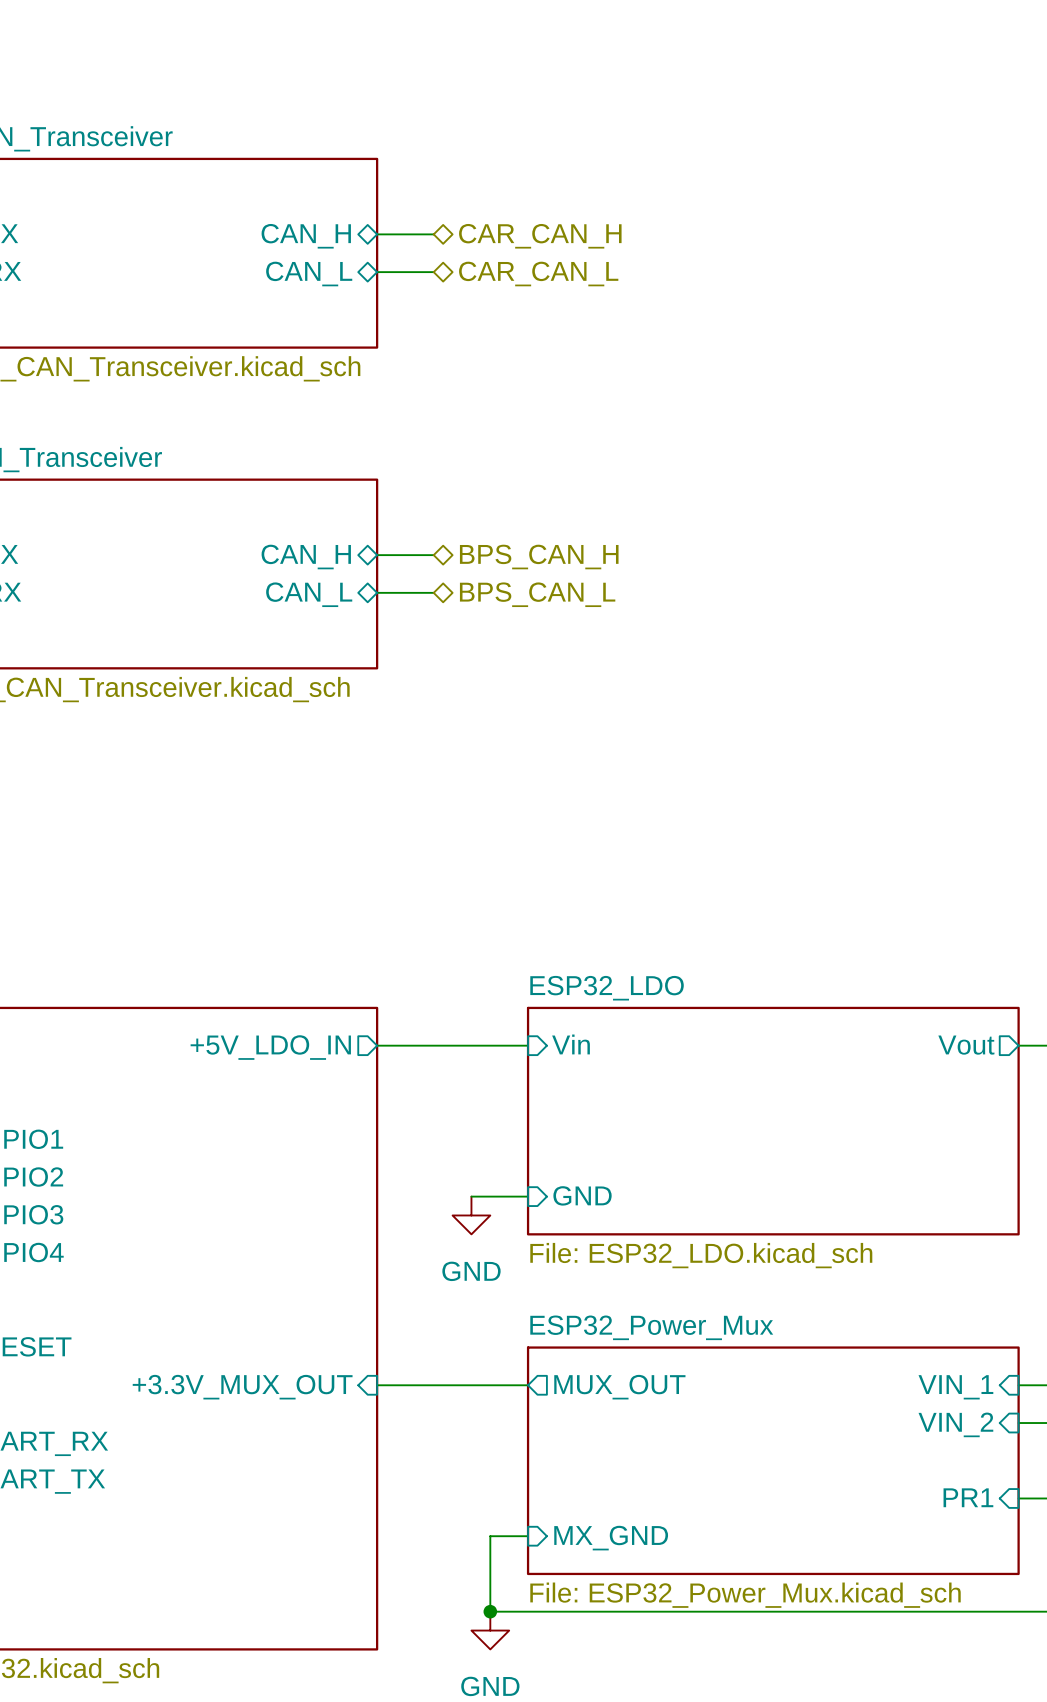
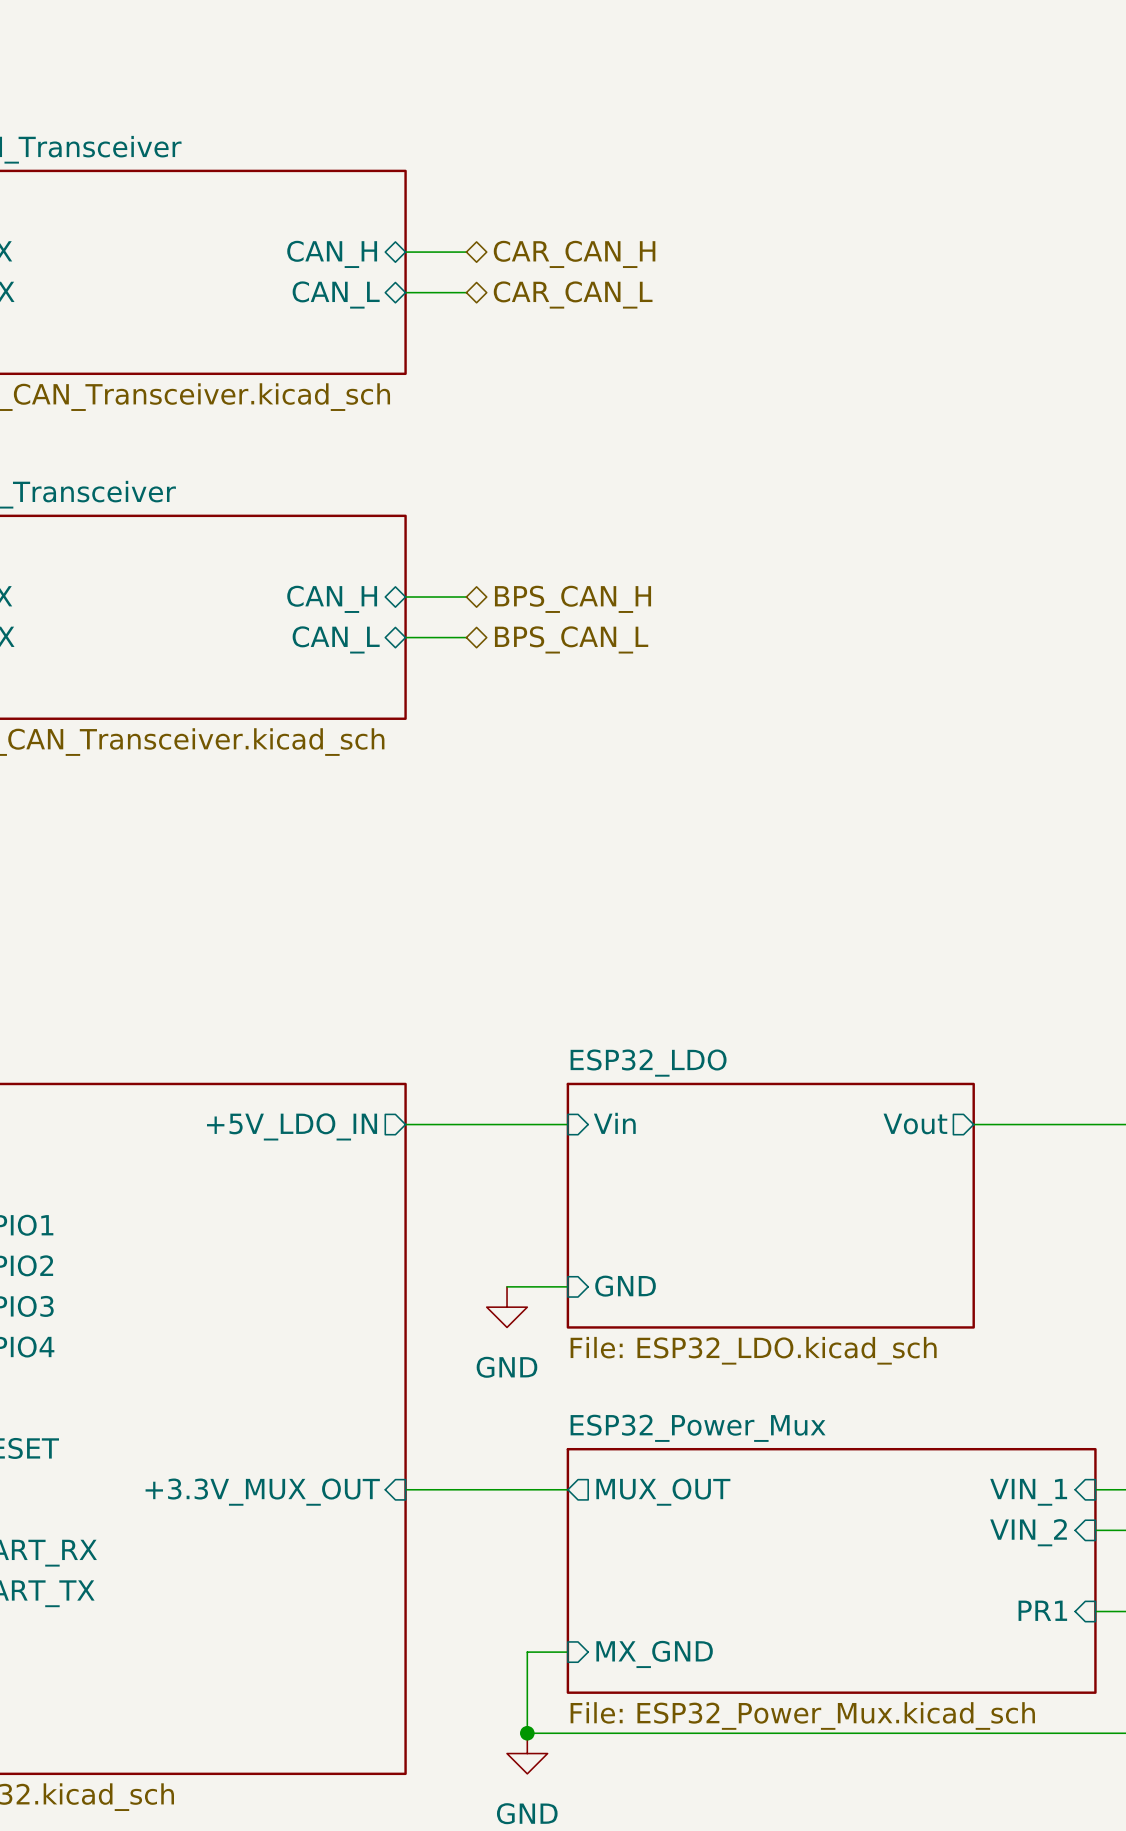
sheet ESP32_LDO shape: [526, 1006, 1020, 1236] -> [566, 1082, 975, 1329]
wire: none -> (973, 1124) (1095, 1124)
sheet pin position: Vout (966, 1045) -> Vout (915, 1123)

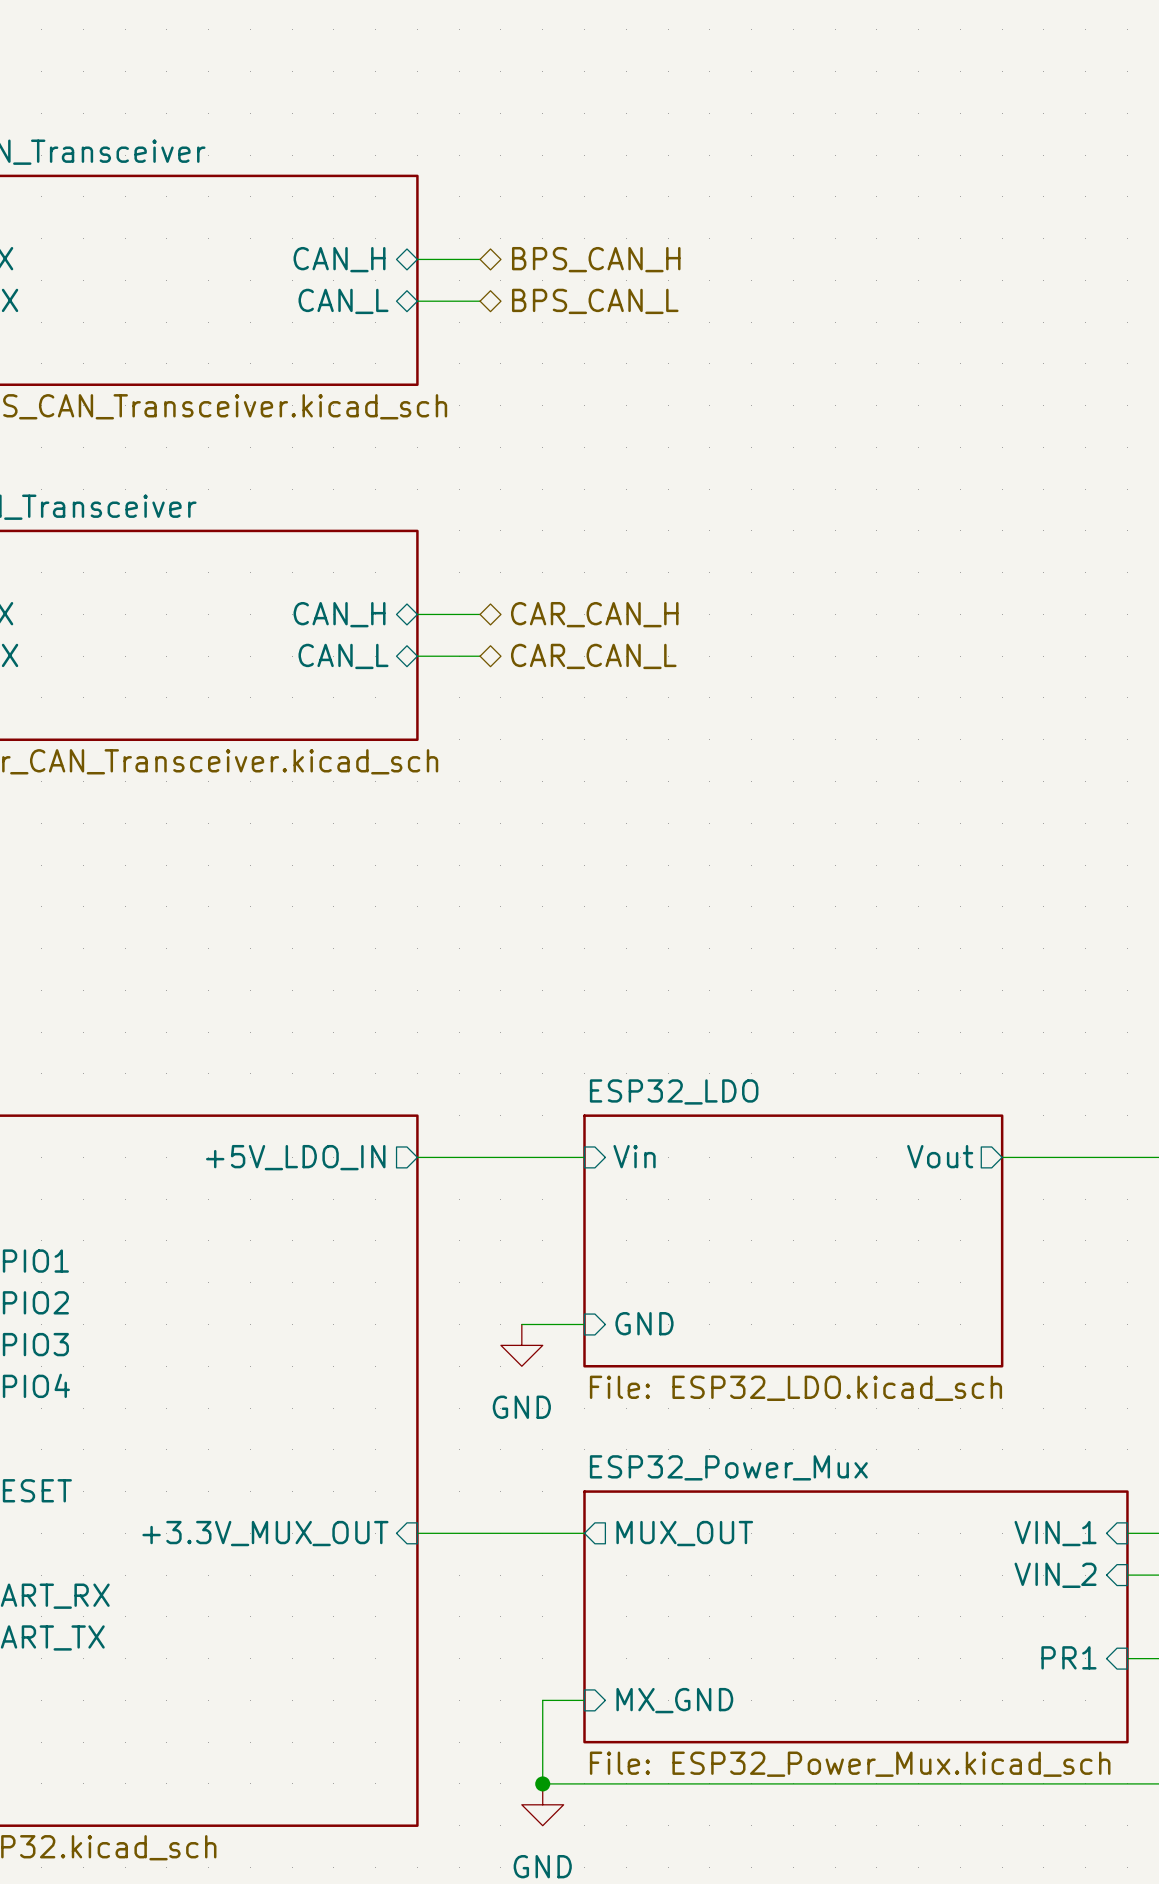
hierarchical label: CAR_CAN_H (574, 254) -> BPS_CAN_H (596, 259)
hierarchical label: CAR_CAN_L (573, 294) -> BPS_CAN_L (595, 301)
hierarchical label: BPS_CAN_H (573, 599) -> CAR_CAN_H (594, 614)
hierarchical label: BPS_CAN_L (571, 639) -> CAR_CAN_L (593, 656)

